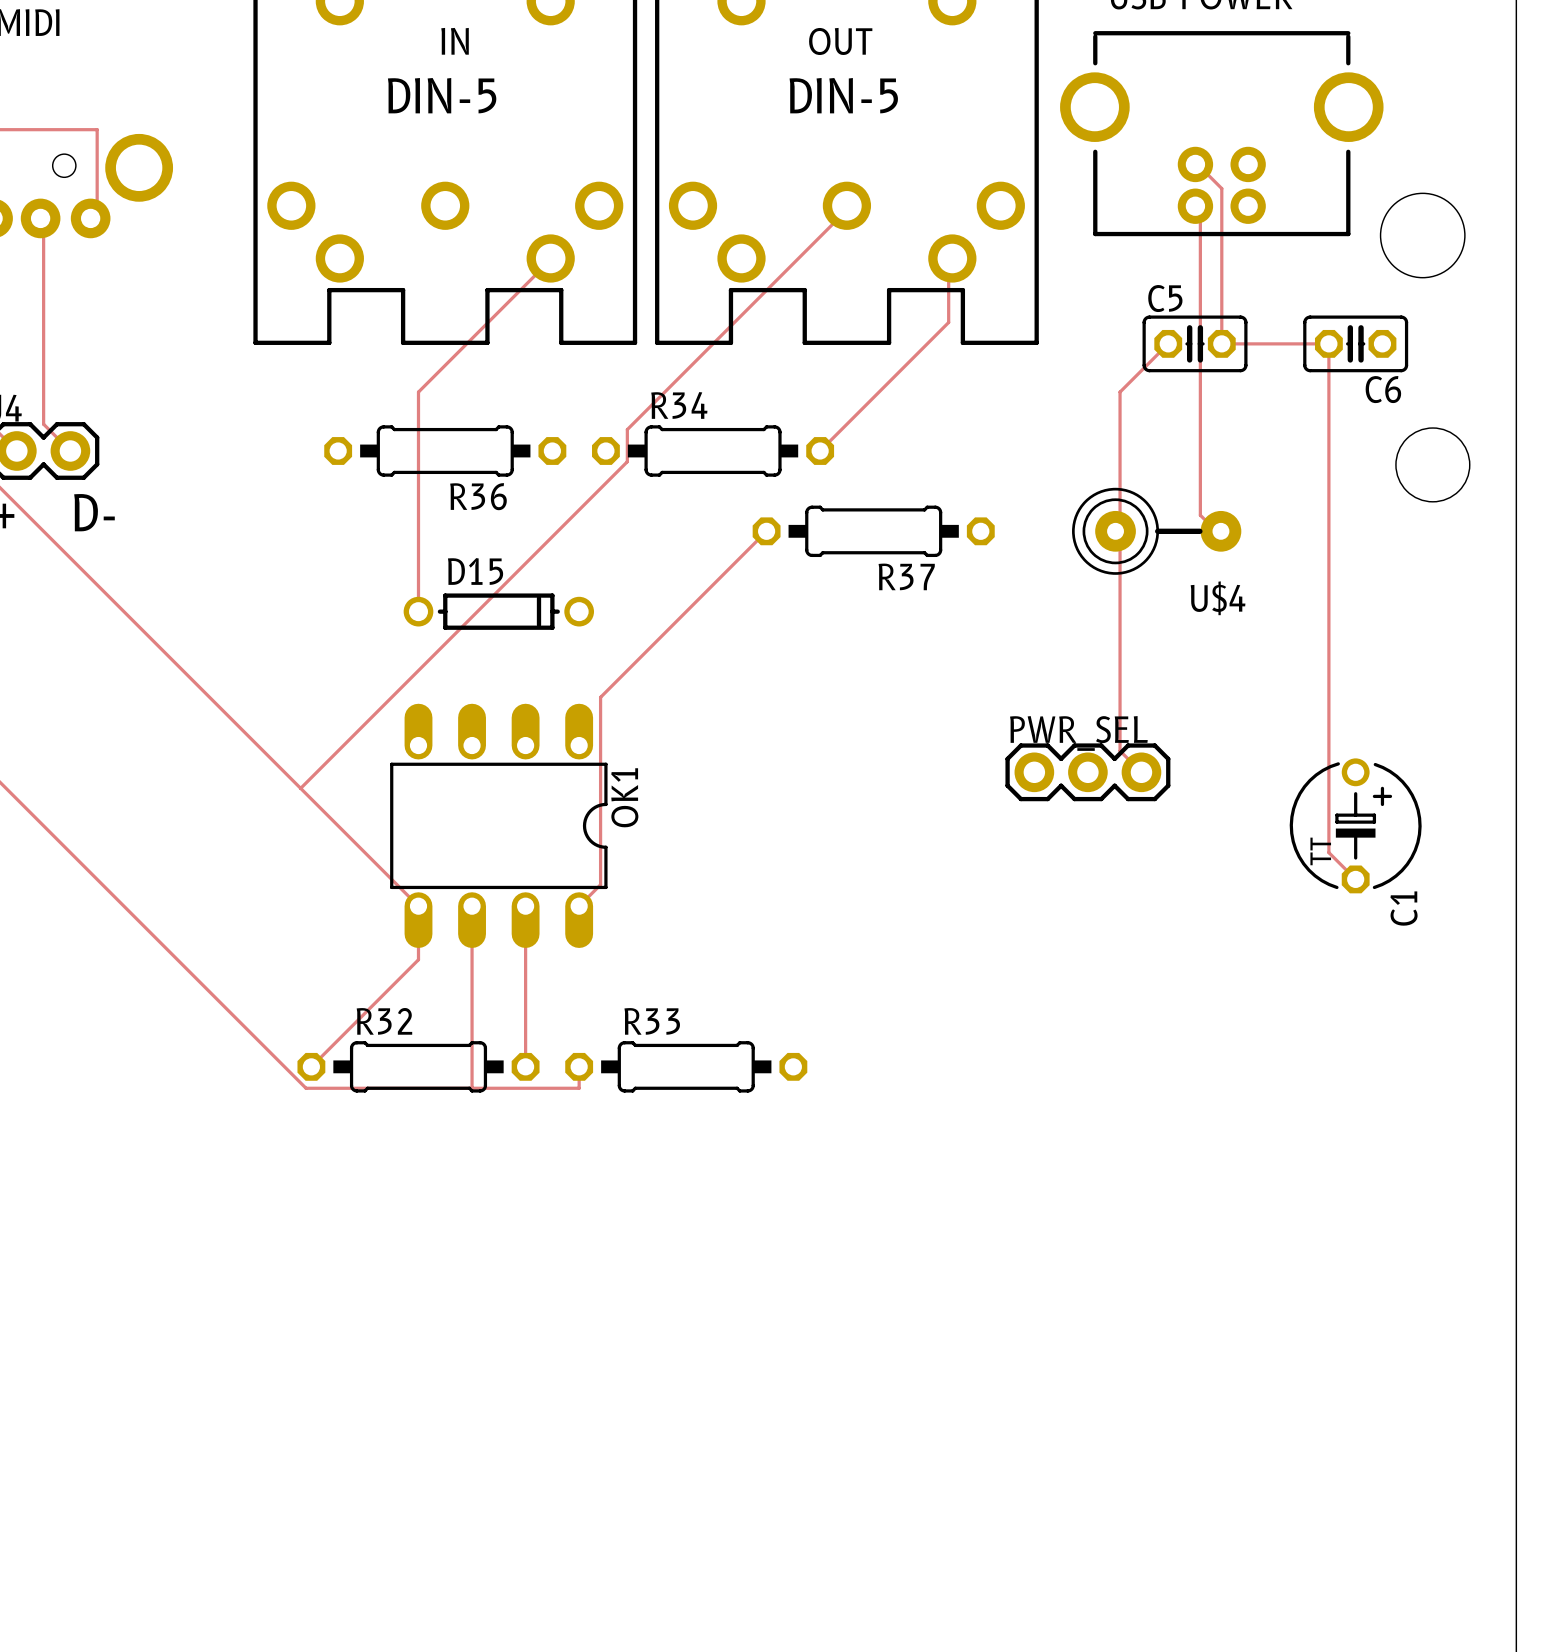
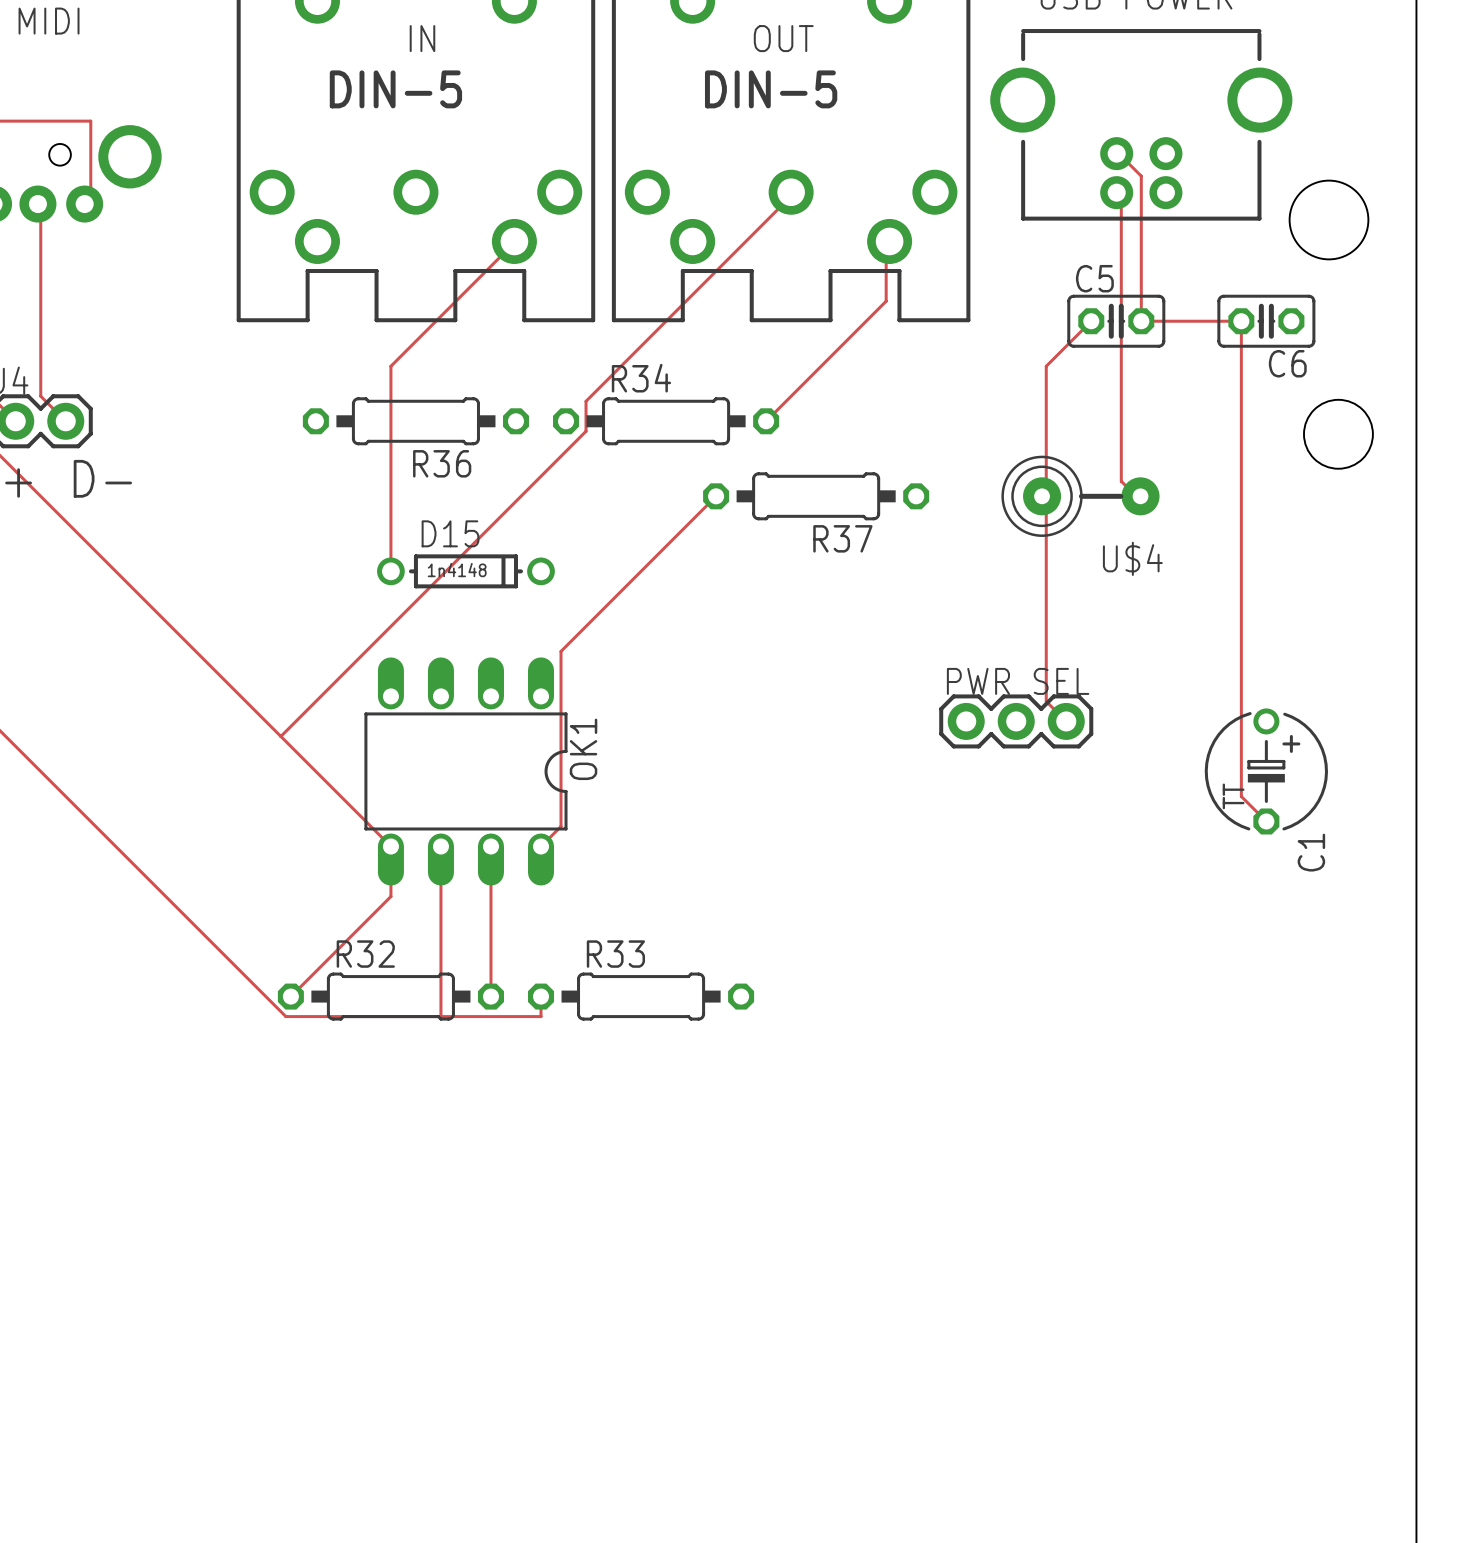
D15 value: none -> 1n4148 (457, 570)

